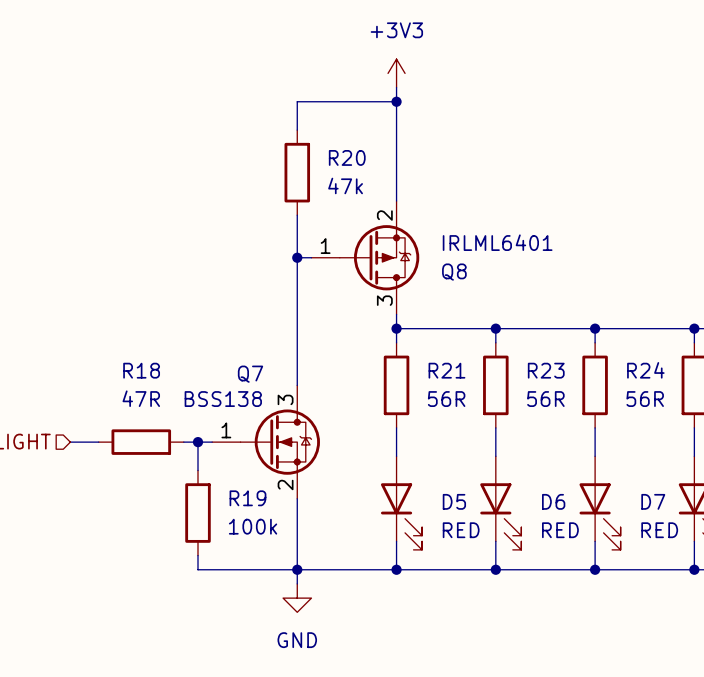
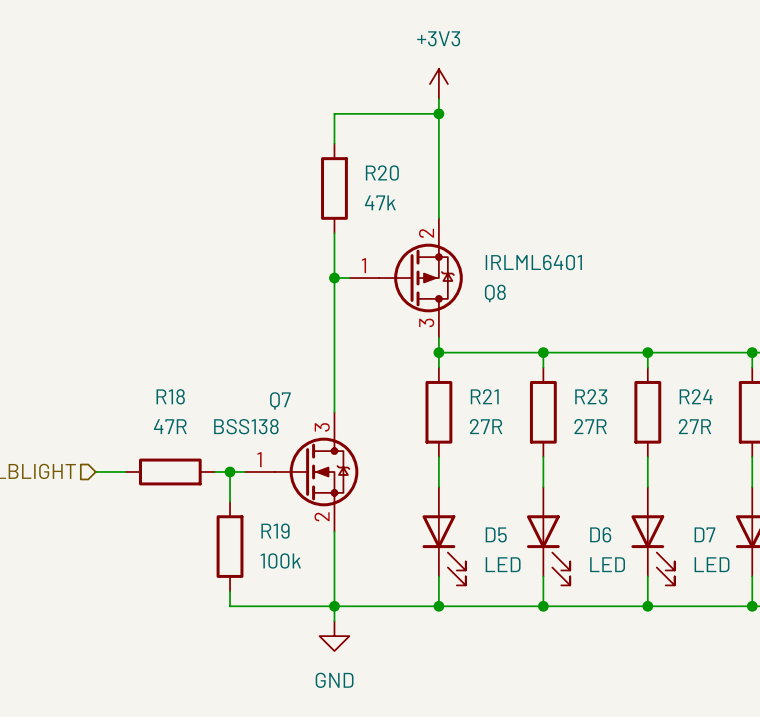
R21 value: 56R (446, 399) -> 27R (486, 426)
R23 value: 56R (545, 399) -> 27R (590, 426)
R24 value: 56R (645, 399) -> 27R (695, 426)
D5 value: RED (461, 530) -> LED (503, 564)
D6 value: RED (560, 530) -> LED (607, 564)
D7 value: RED (659, 530) -> LED (712, 564)

